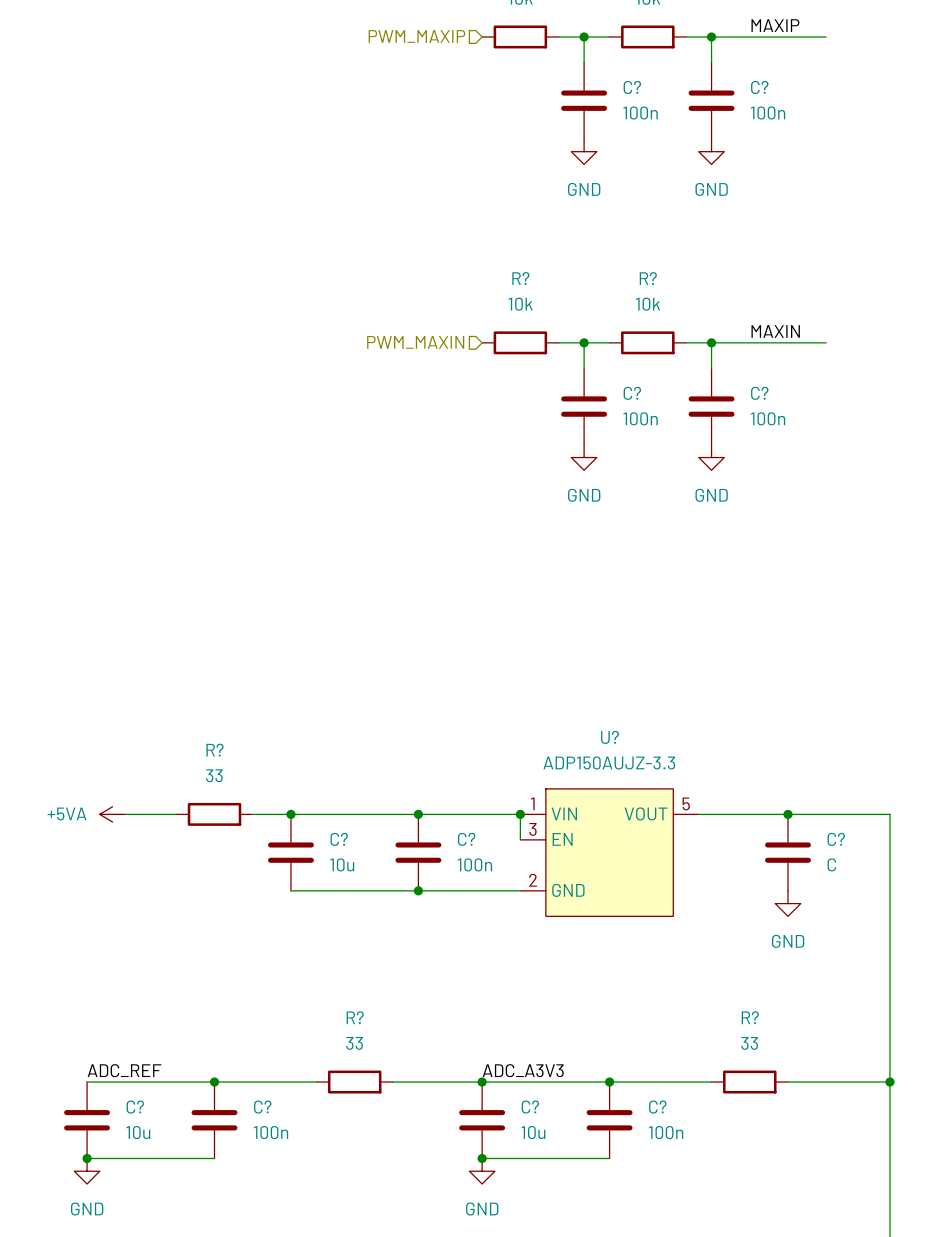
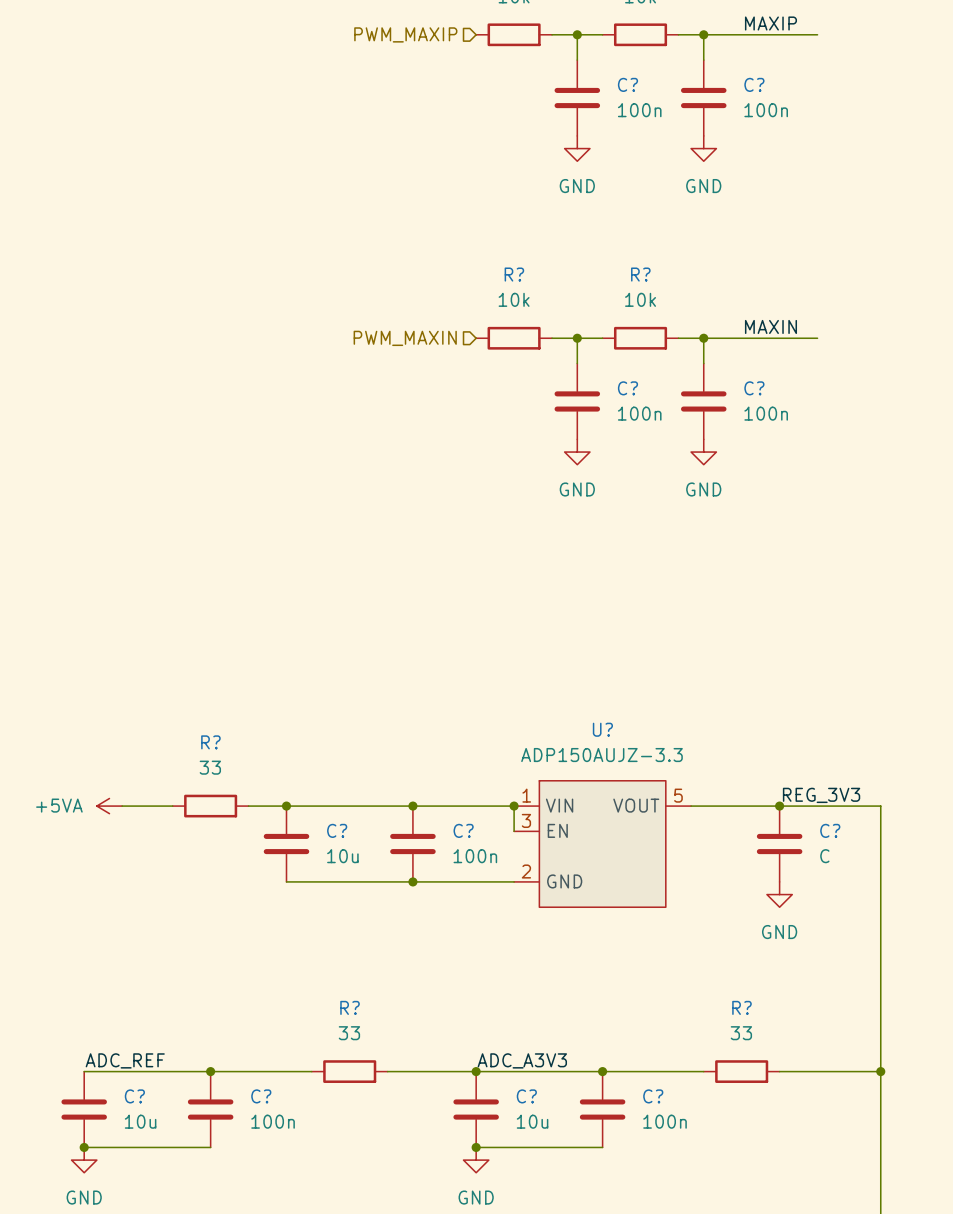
label: none -> REG_3V3 (821, 795)

